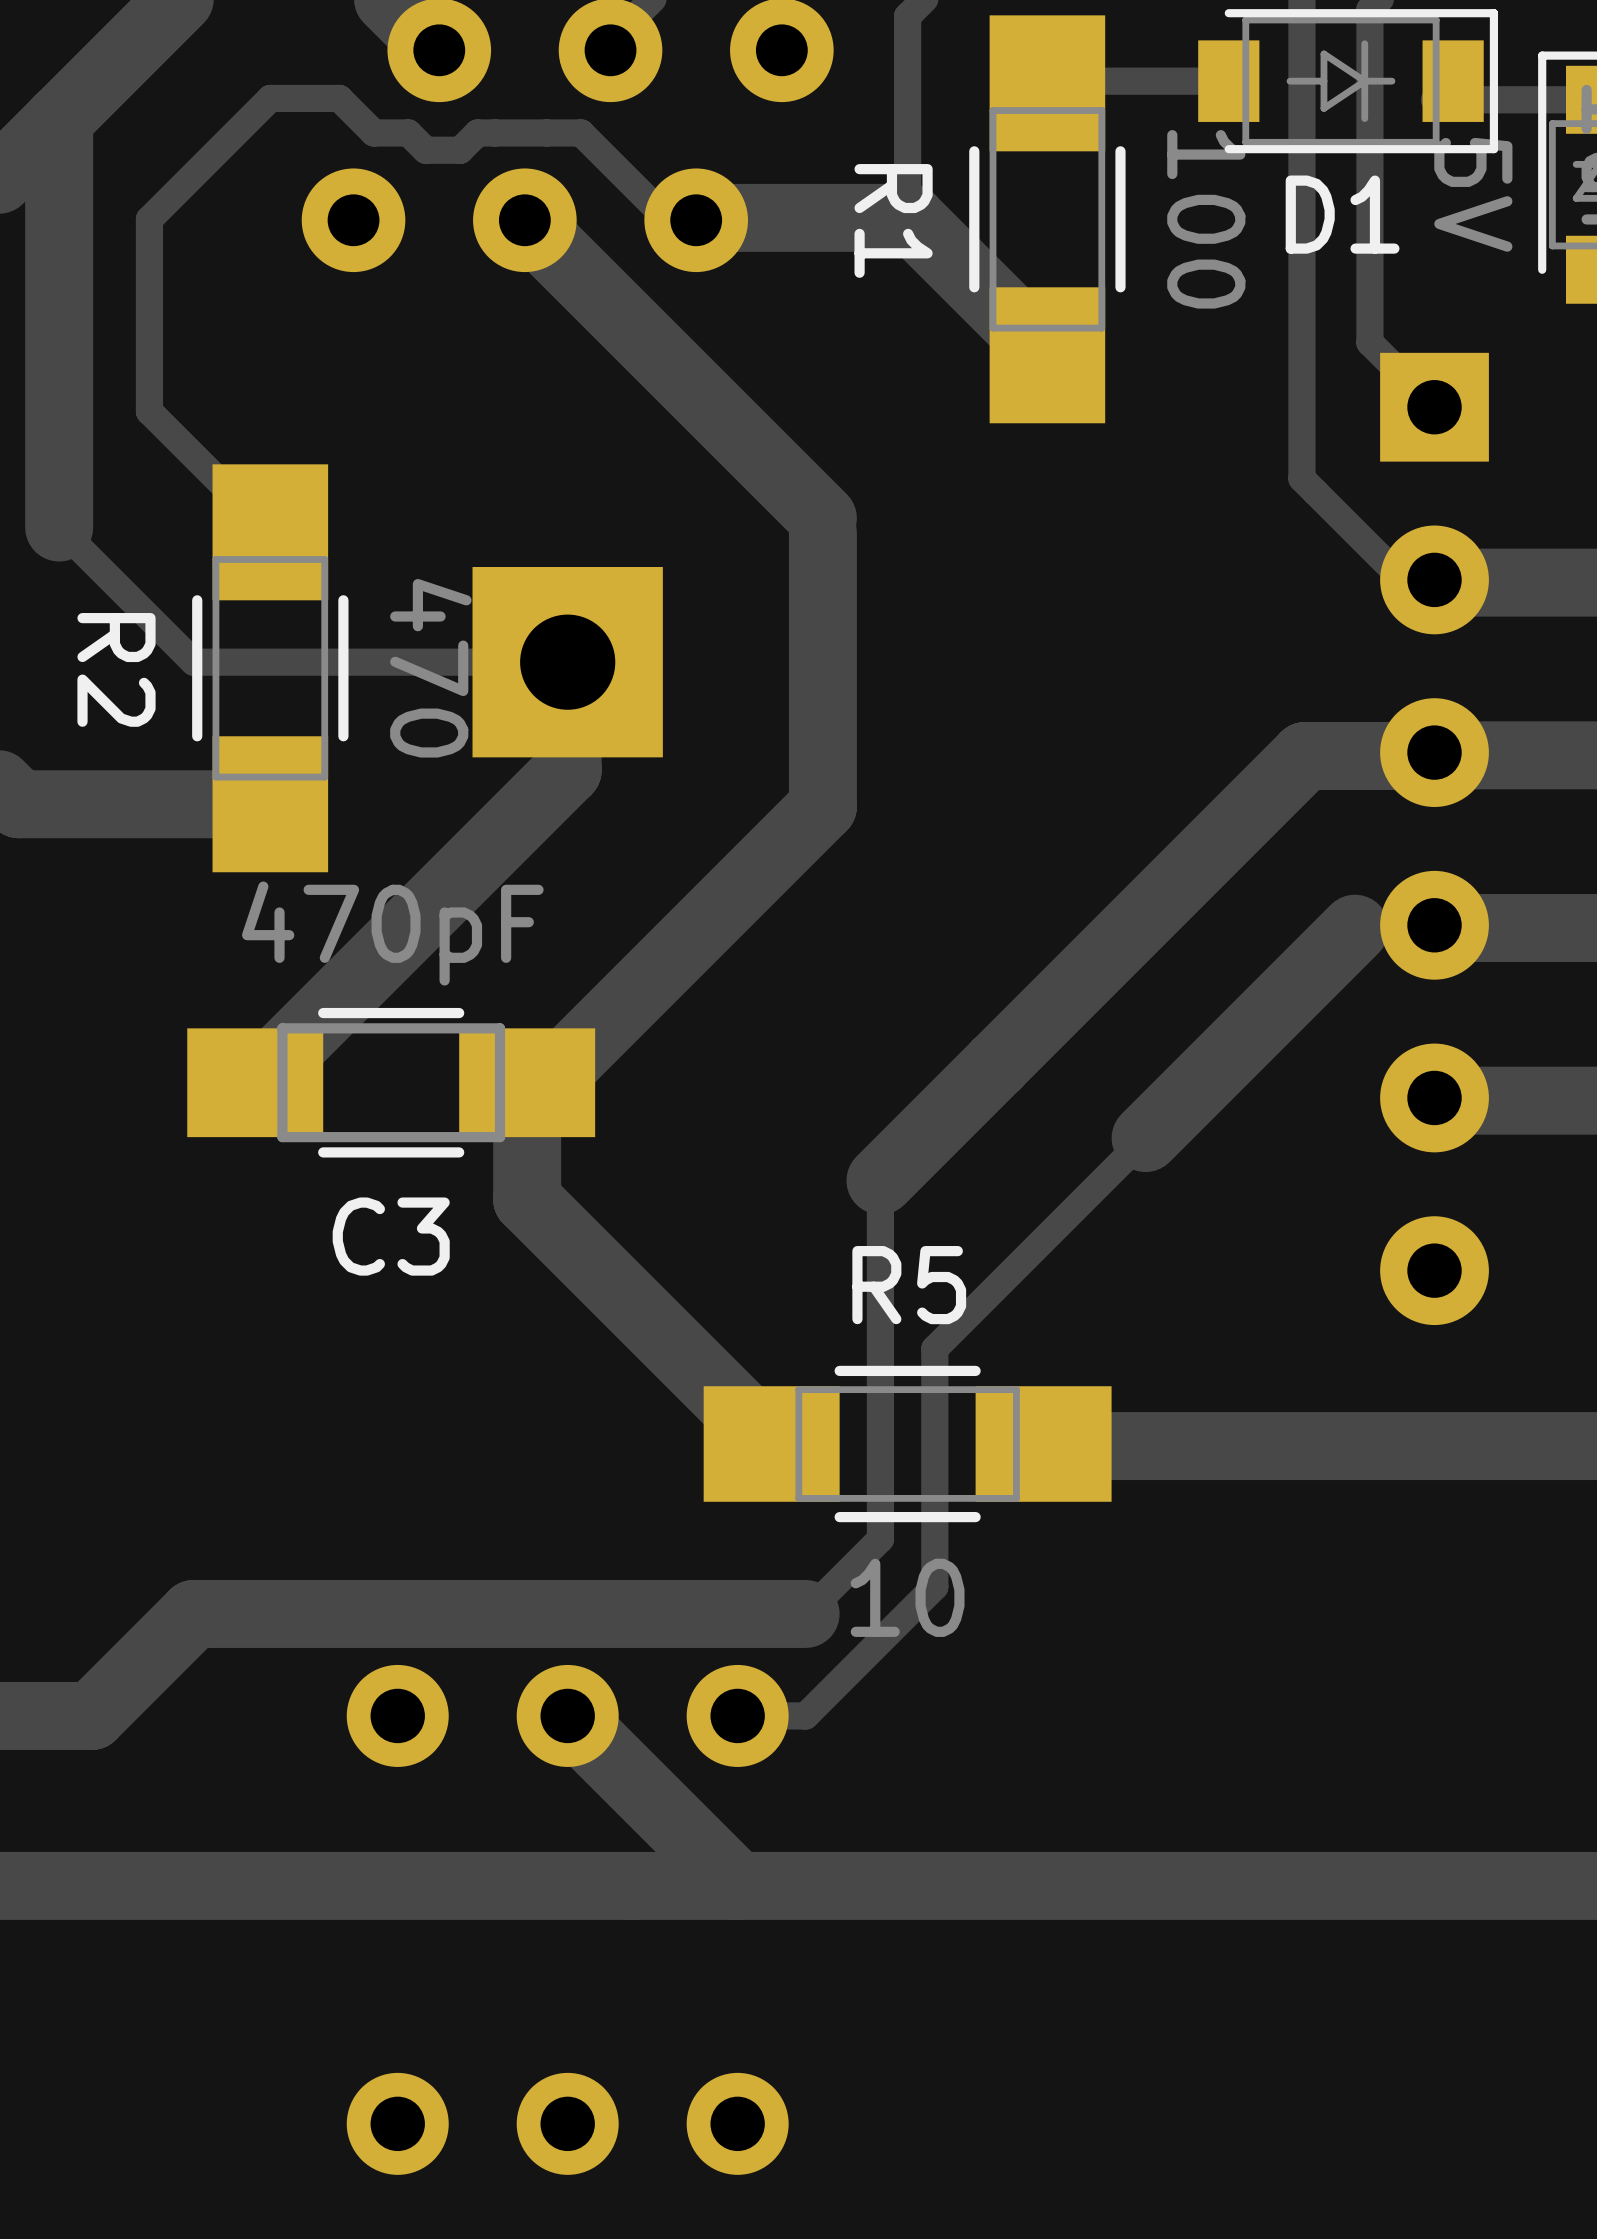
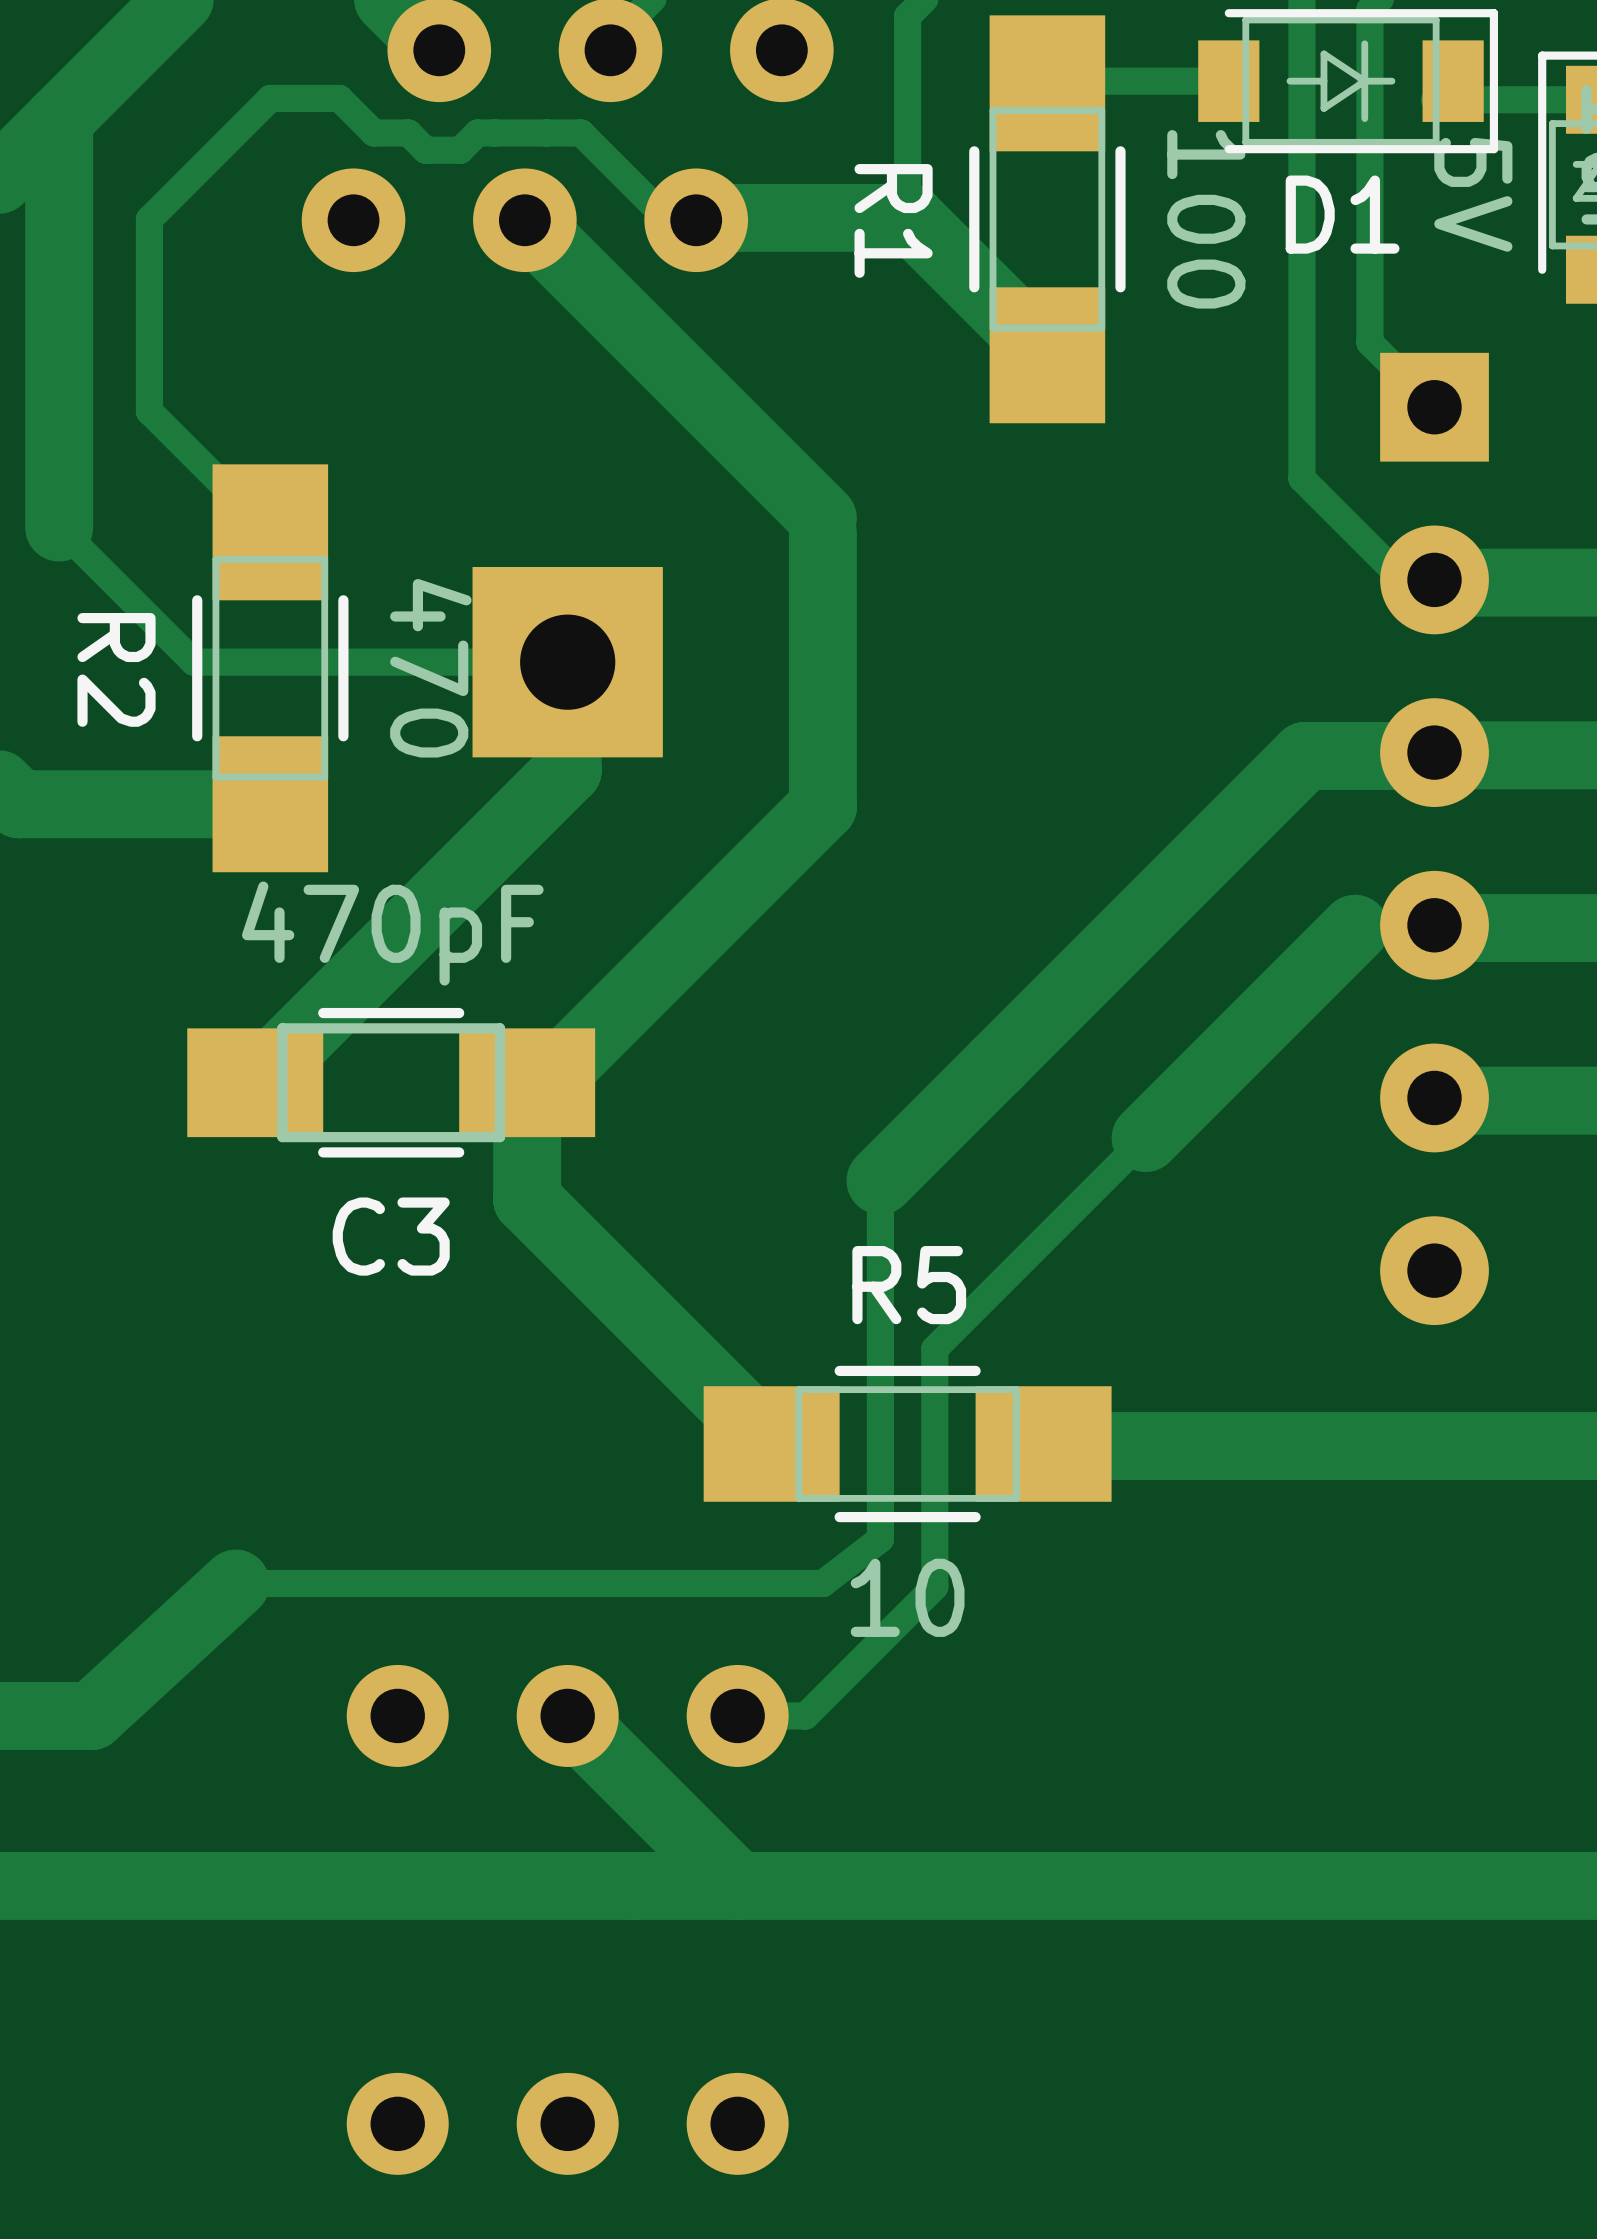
track: (880, 1539) (805, 1613) (193, 1613) (91, 1715) -> (880, 1539) (822, 1583) (235, 1583) (91, 1715)

